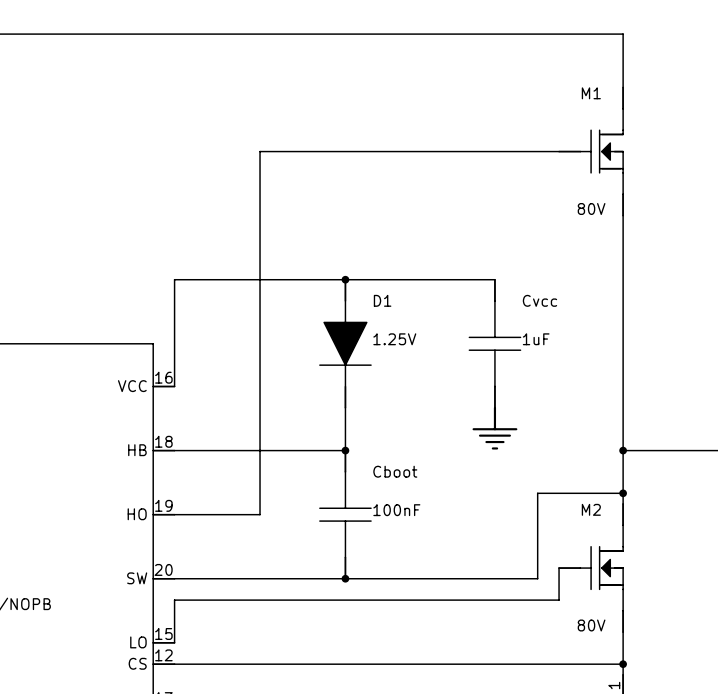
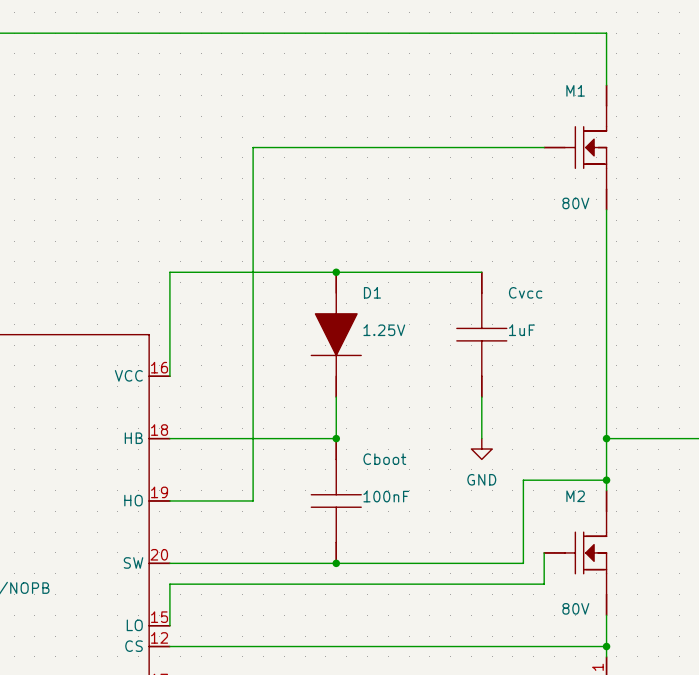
power symbol: (494, 428) -> none
power symbol: none -> GND (481, 449)

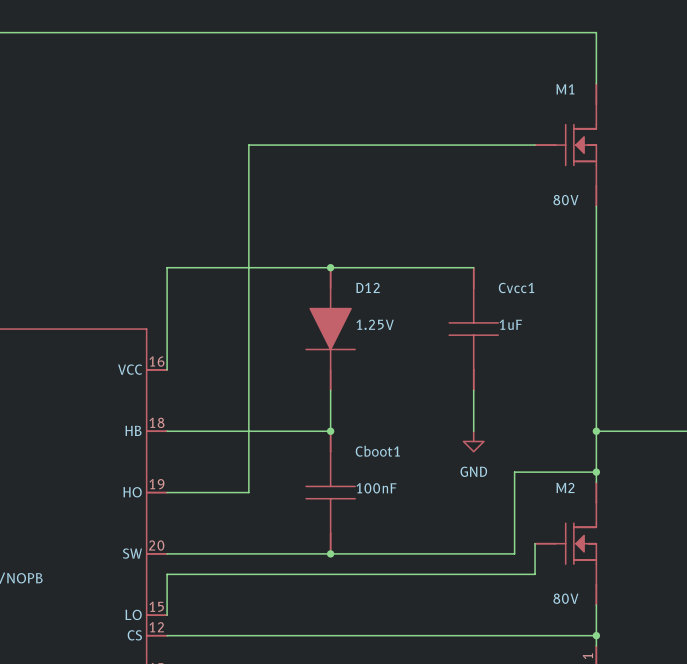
D1 name: D1 (372, 292) -> D12 (368, 287)
Cvcc name: Cvcc (525, 292) -> Cvcc1 (516, 287)
Cboot name: Cboot (384, 459) -> Cboot1 (377, 451)

